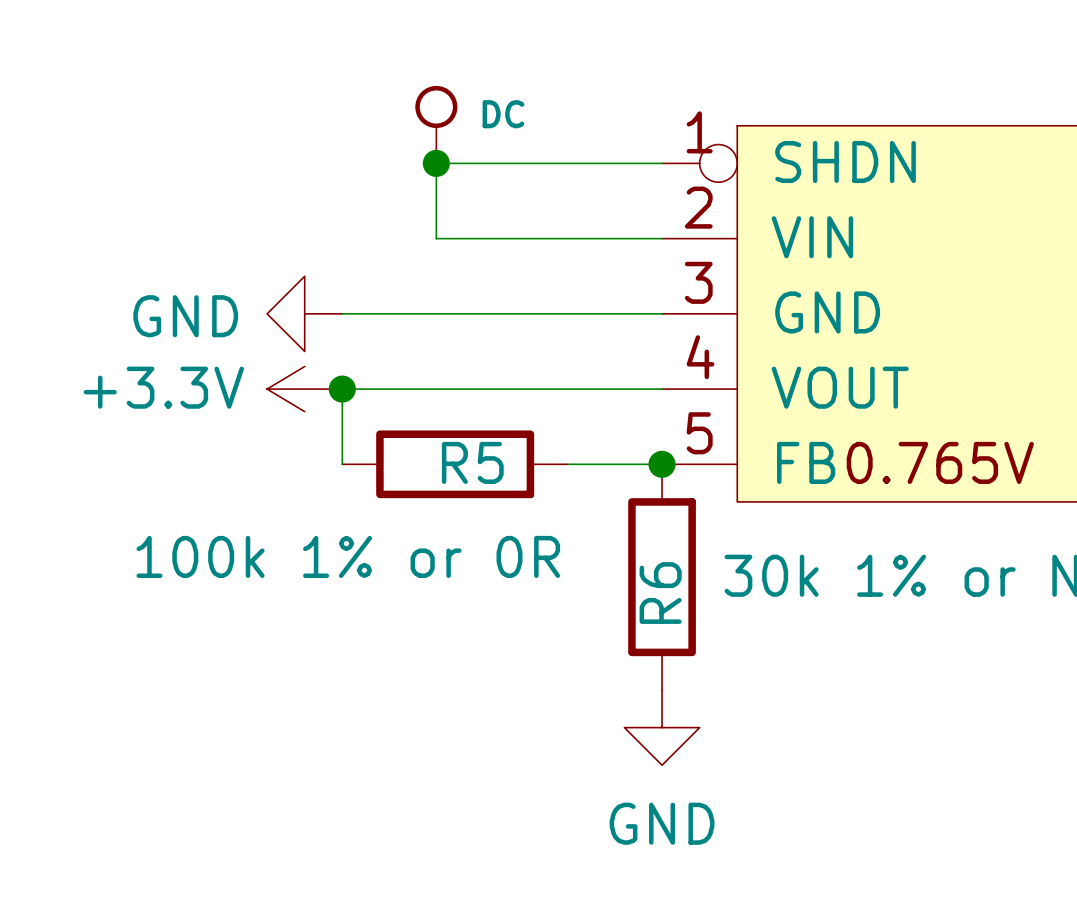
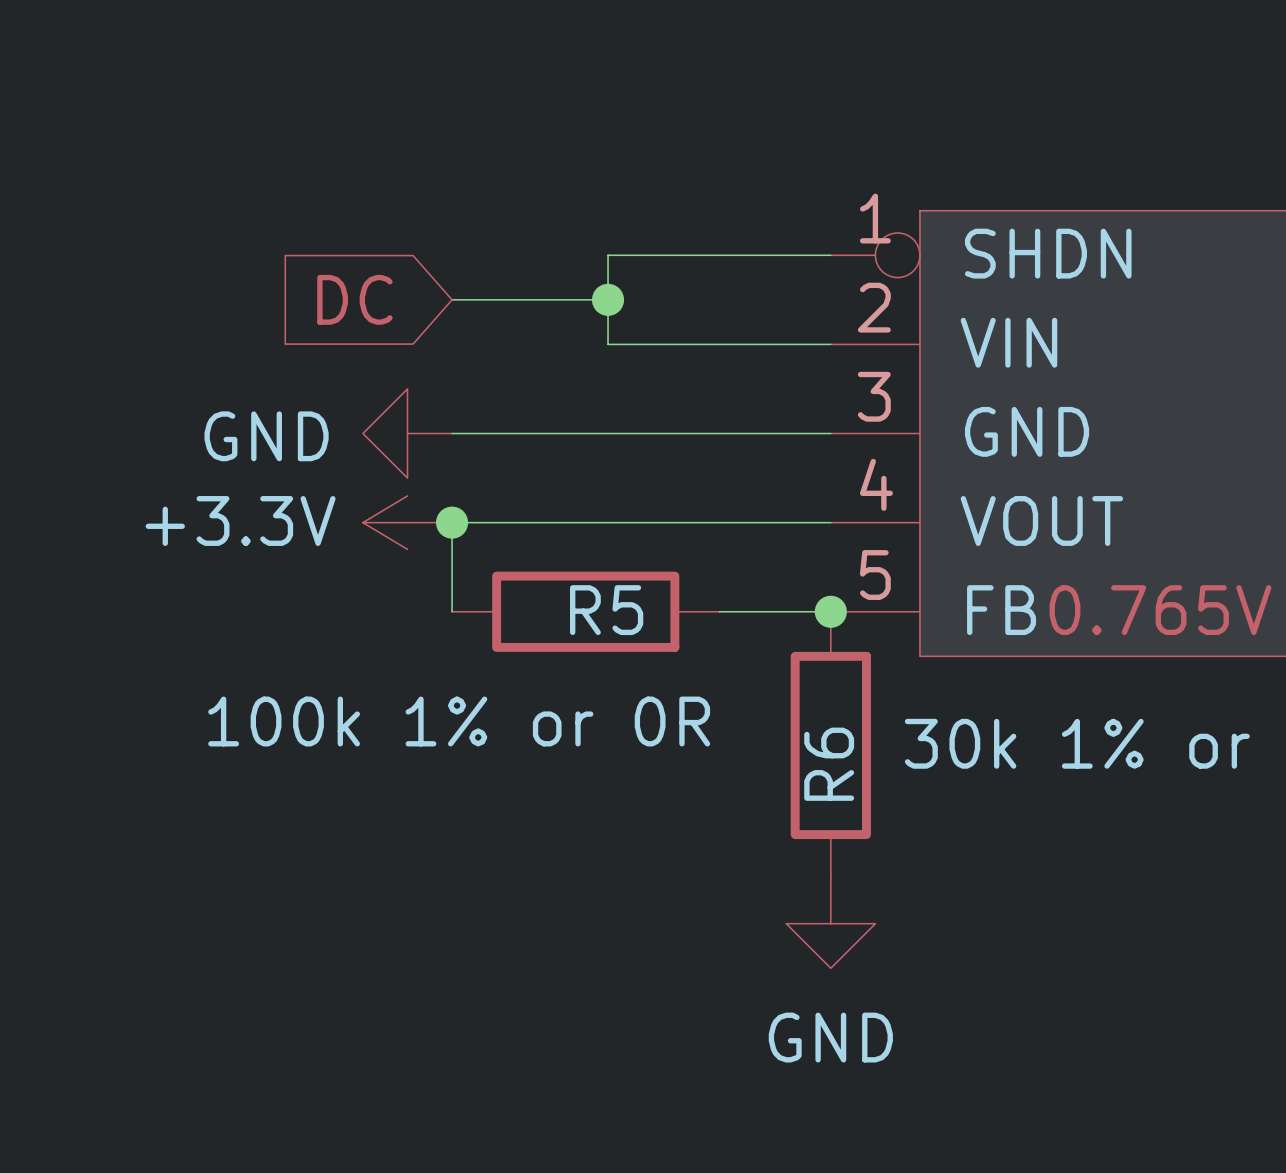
part: DC (436, 124) -> none
junction position: (436, 163) -> (608, 299)
wire: (473, 163) (436, 163) (436, 238) (473, 238) -> (608, 255) (608, 344)
global label: none -> DC (354, 299)
wire: none -> (452, 299) (608, 299)

